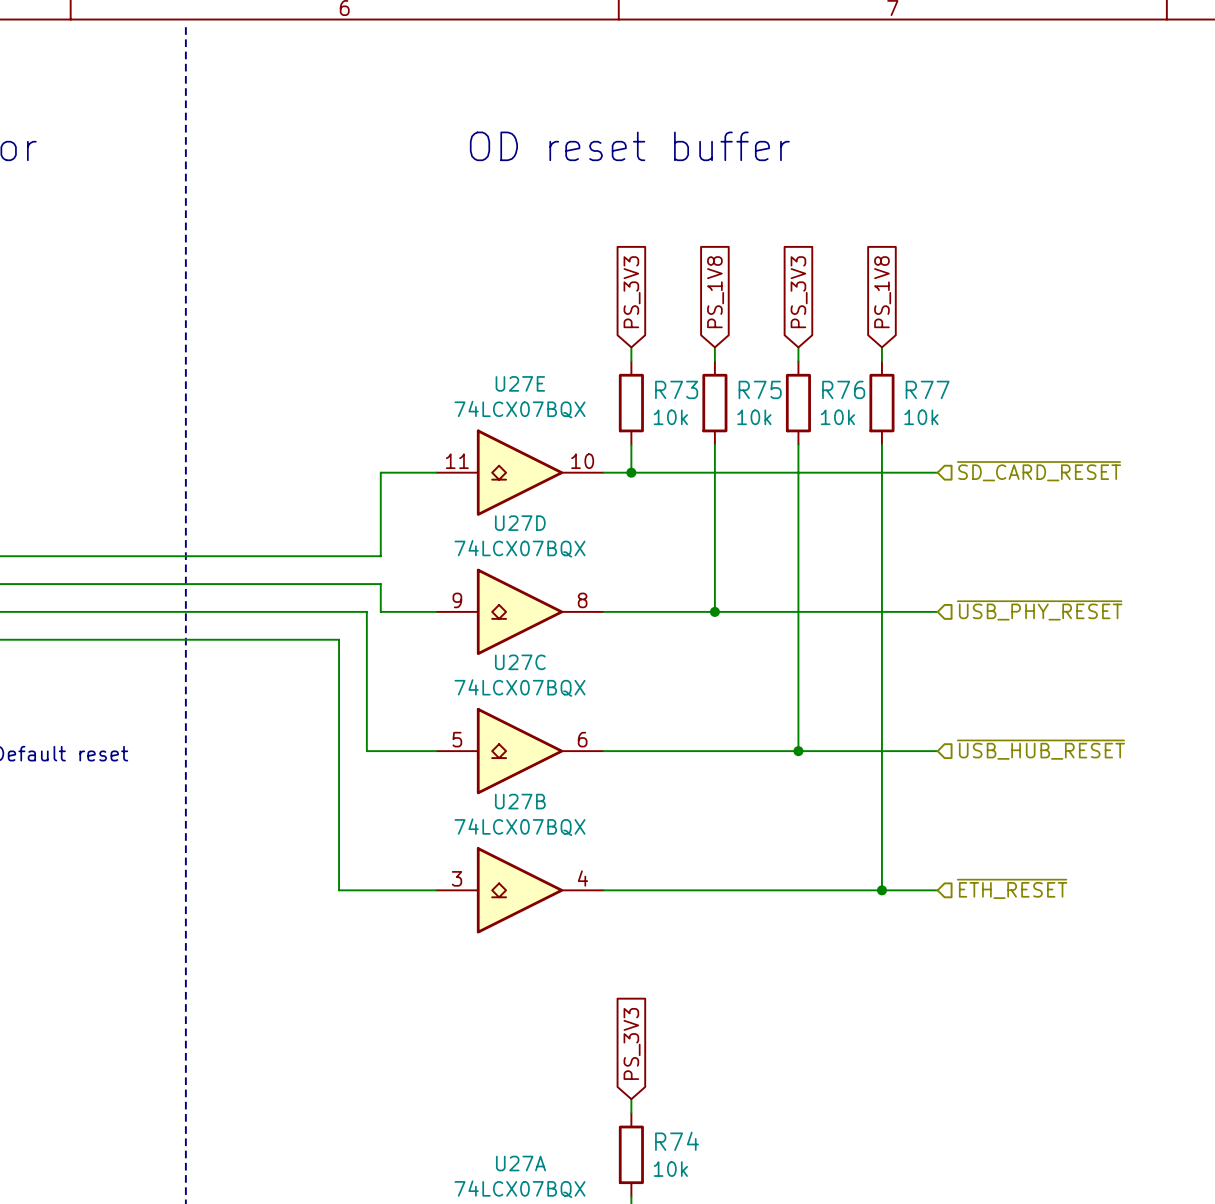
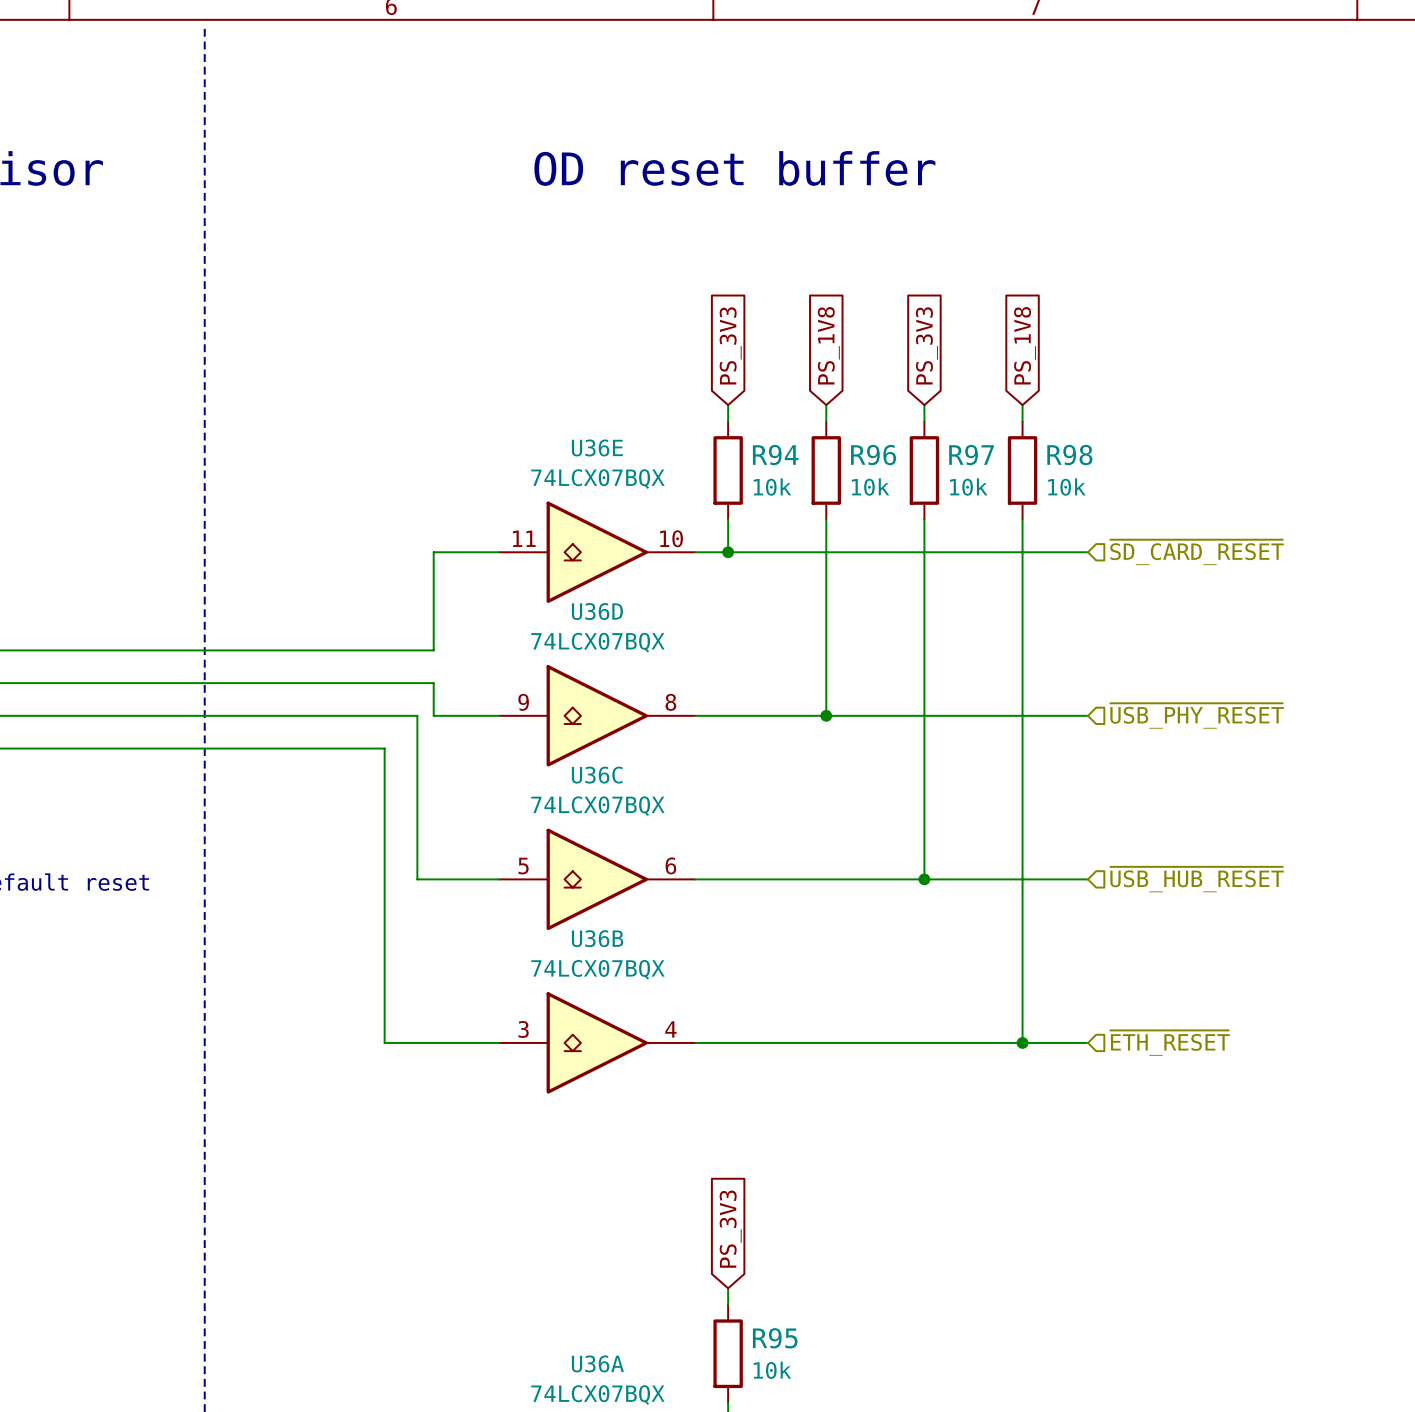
U27E name: U27E (520, 383) -> U36E (597, 447)
R73 name: R73 (676, 389) -> R94 (775, 455)
R75 name: R75 (760, 389) -> R96 (873, 455)
R76 name: R76 (843, 389) -> R97 (971, 455)
R77 name: R77 (927, 389) -> R98 (1069, 455)
U27D name: U27D (520, 523) -> U36D (597, 611)
U27C name: U27C (520, 662) -> U36C (597, 775)
U27B name: U27B (520, 801) -> U36B (597, 938)
R74 name: R74 (677, 1141) -> R95 (775, 1338)
U27A name: U27A (521, 1163) -> U36A (597, 1363)

